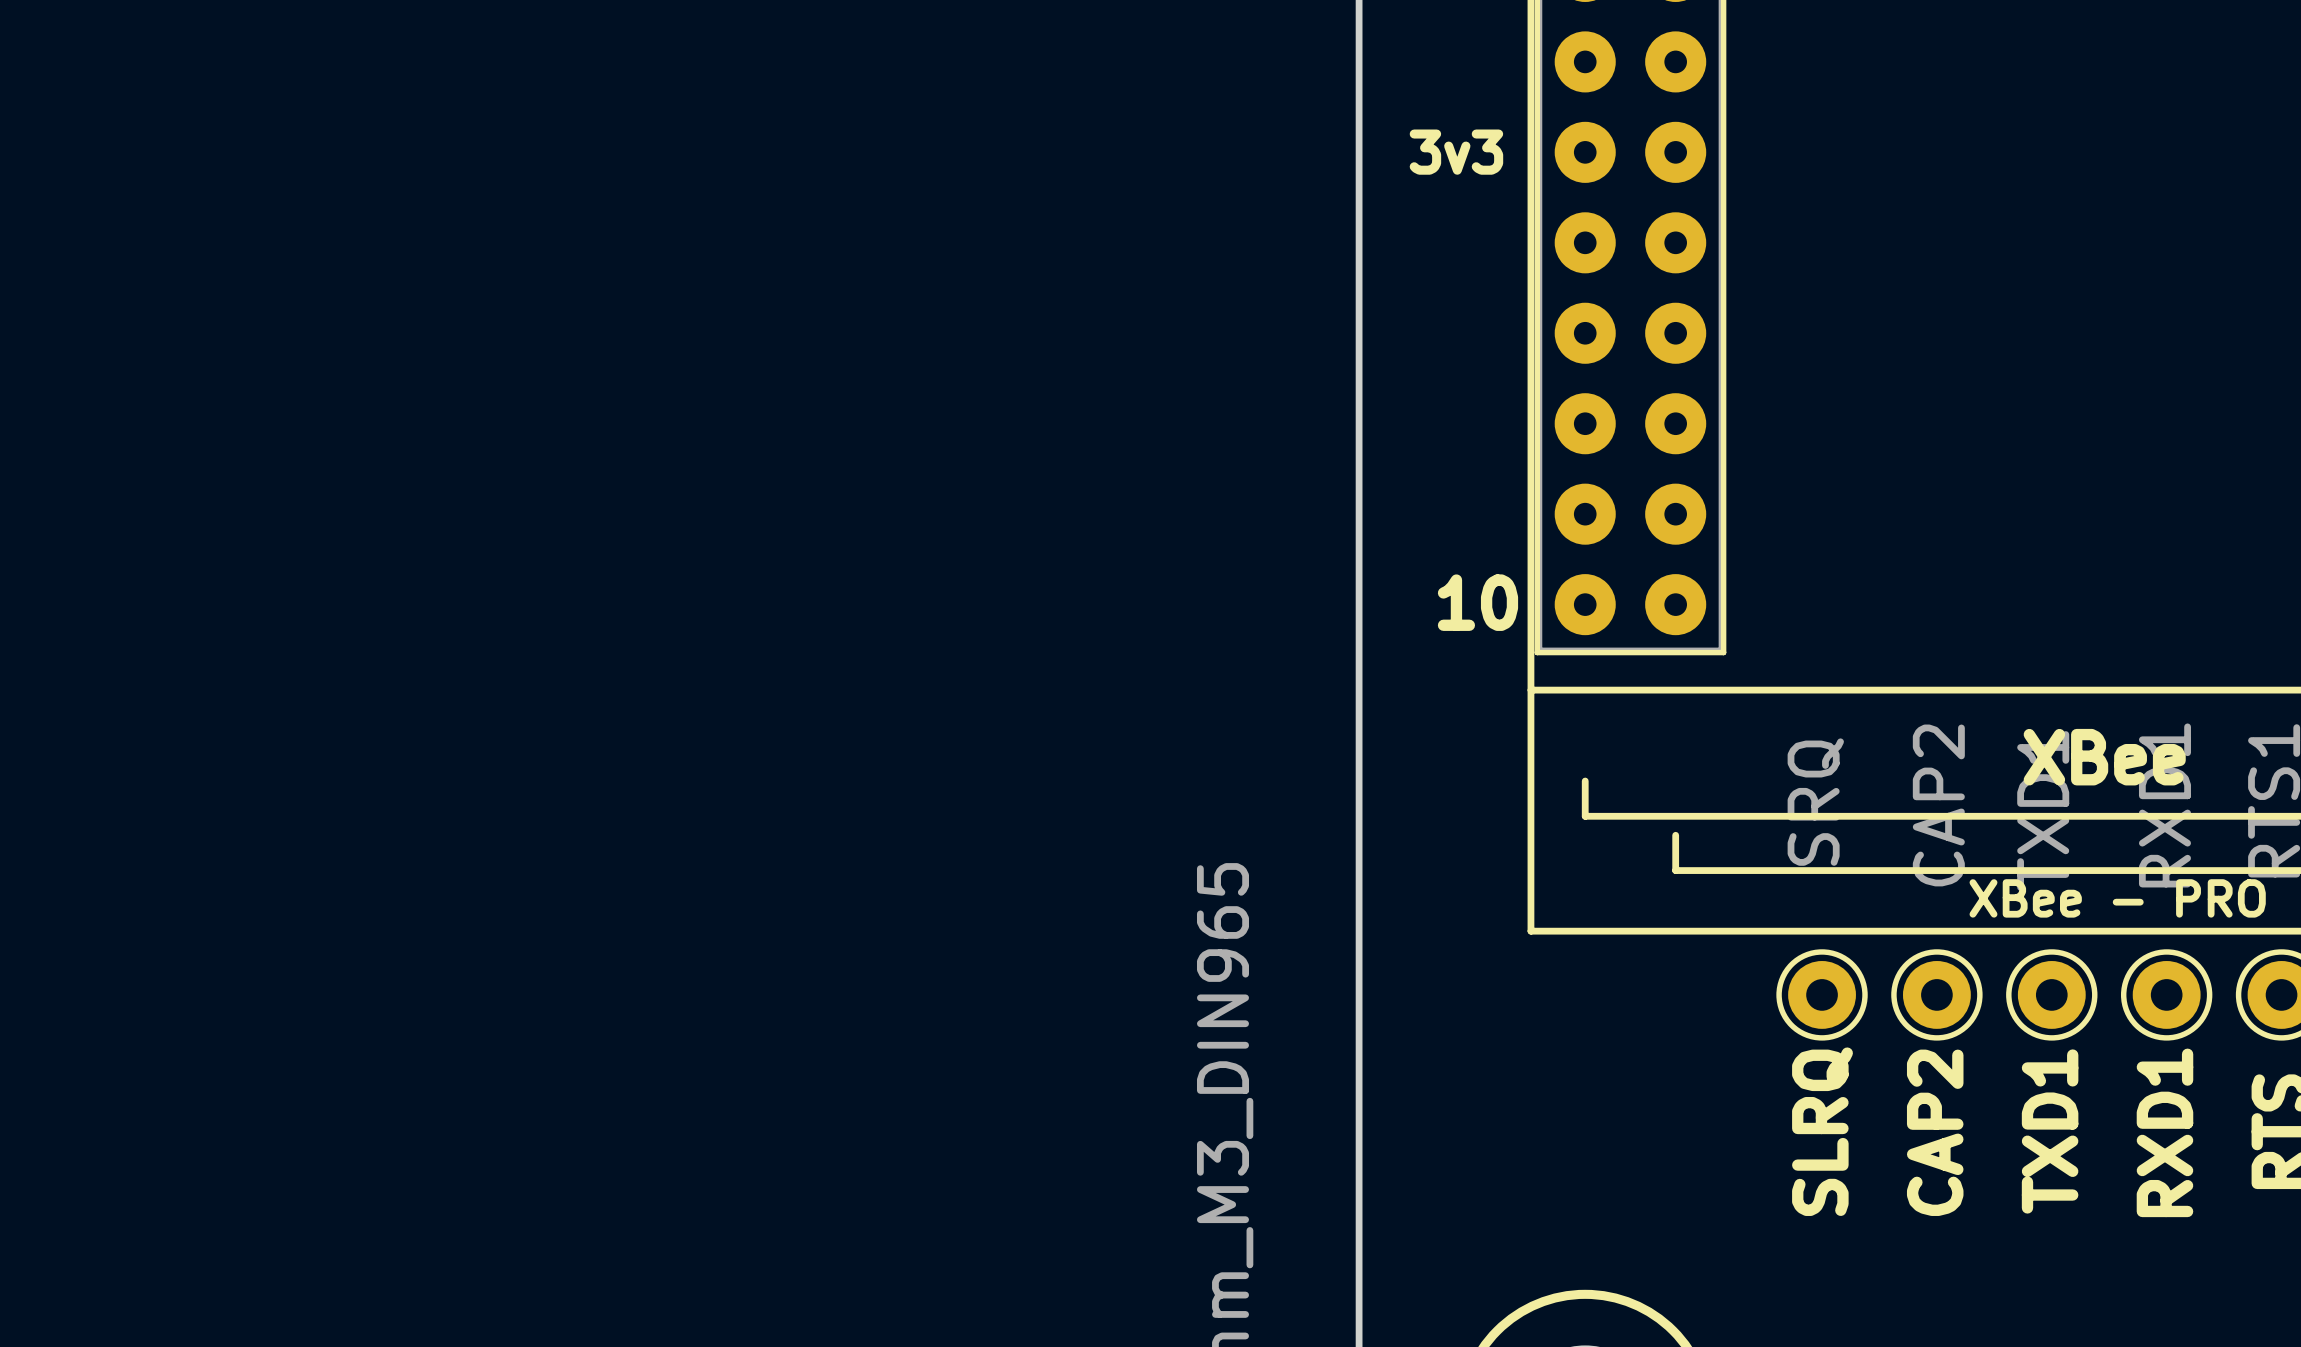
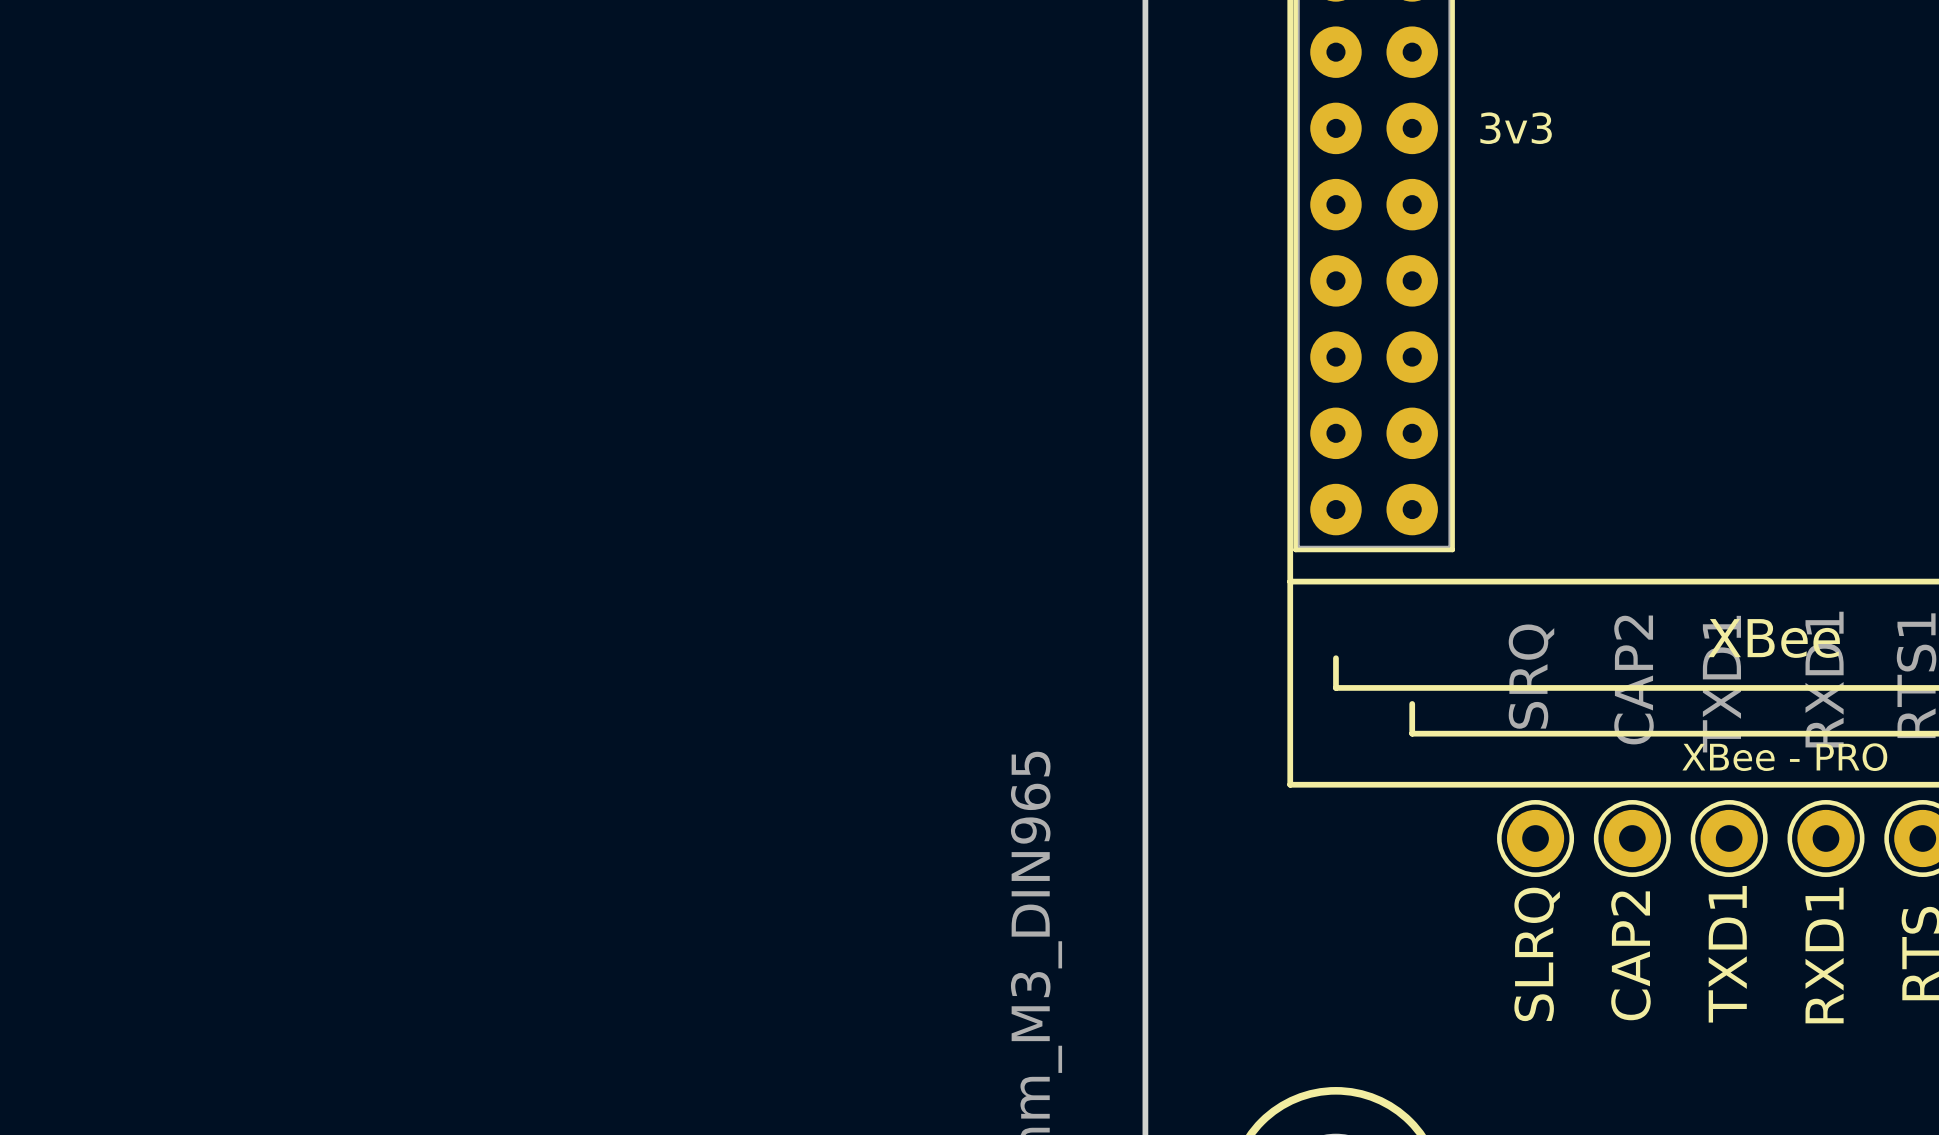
text position: 3v3 (1456, 152) -> 3v3 (1516, 128)
text: 10 (1477, 602) -> none

